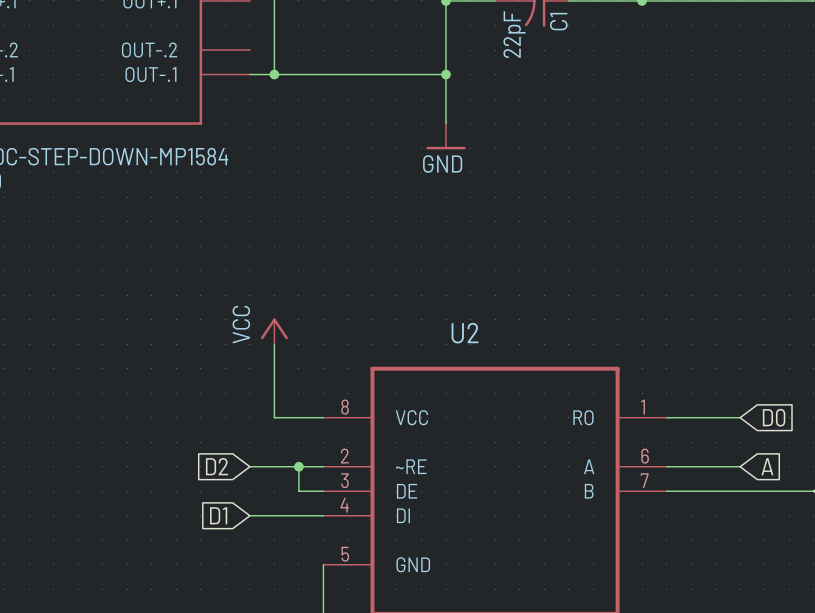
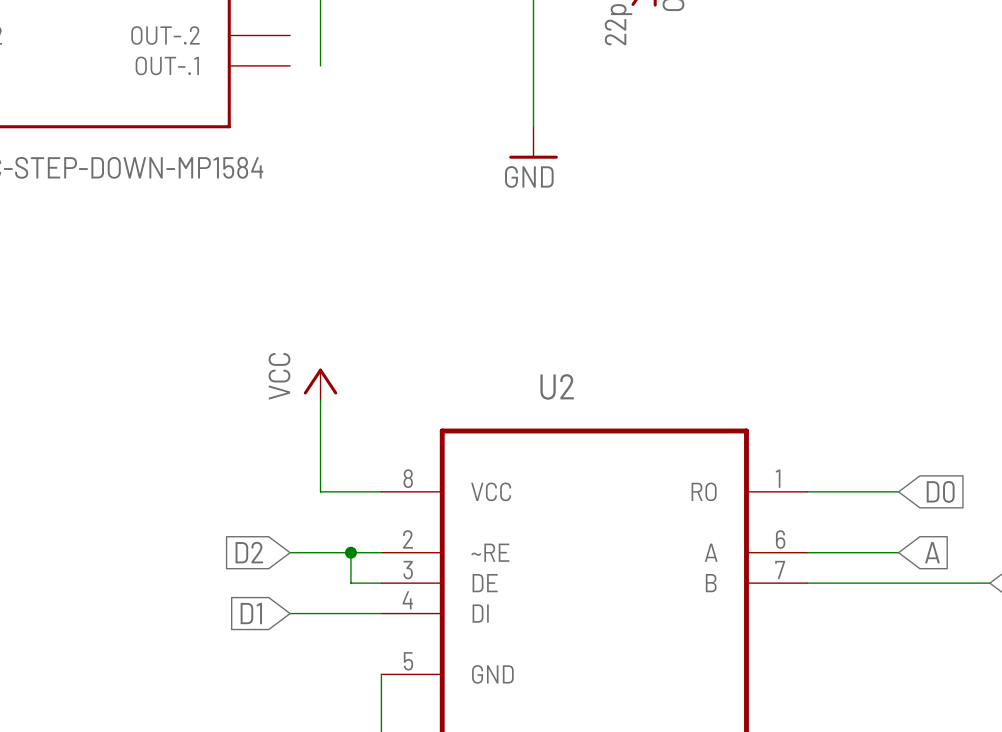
wire: (249, 74) (446, 74) -> none
junction: (274, 74) -> none
junction: (446, 74) -> none

